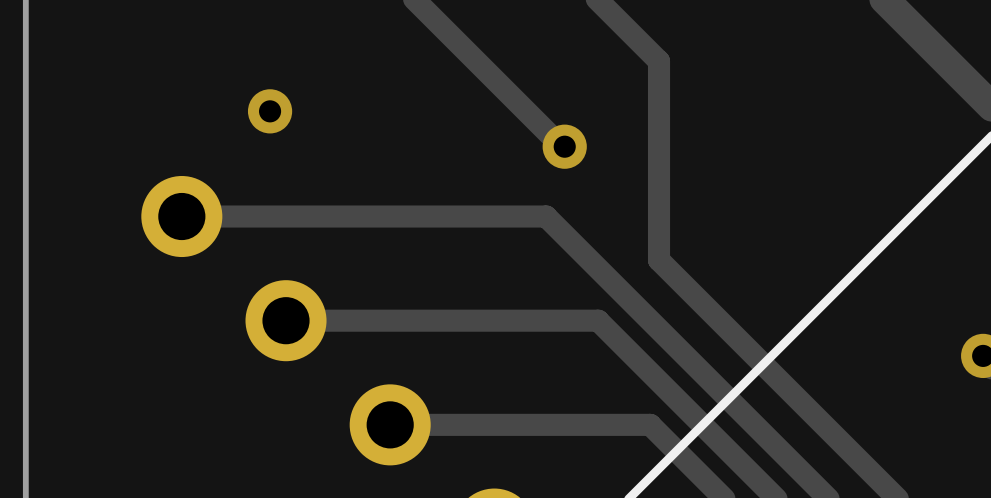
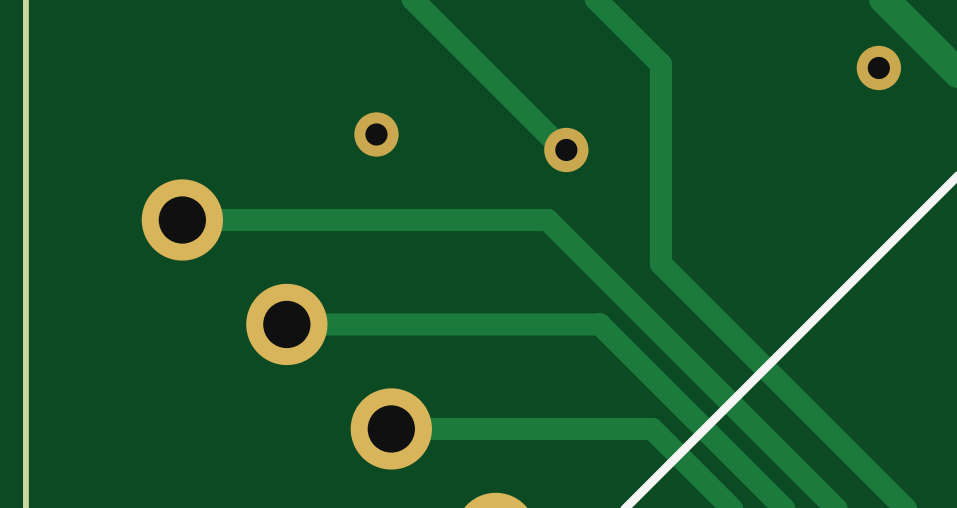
via: none -> (878, 67)
via position: (270, 111) -> (376, 134)

